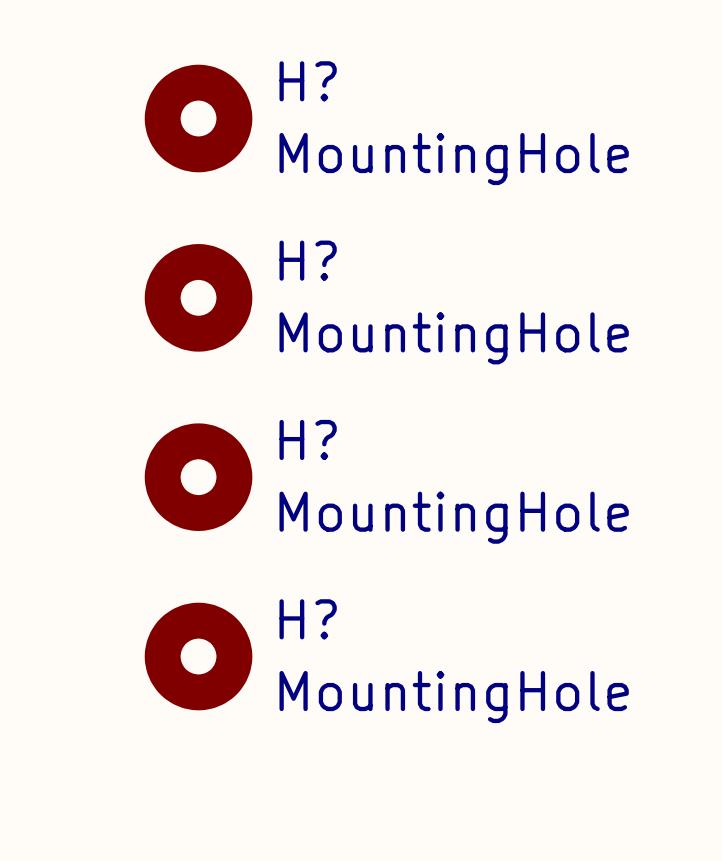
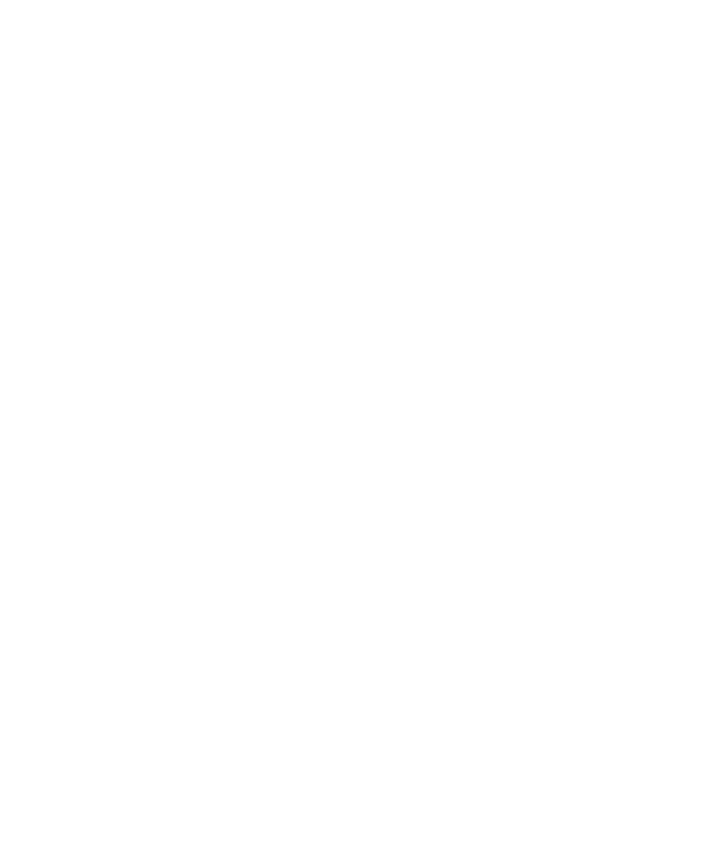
H?: MountingHole (198, 118) -> none
H?: MountingHole (198, 297) -> none
H?: MountingHole (198, 477) -> none
H?: MountingHole (198, 656) -> none

